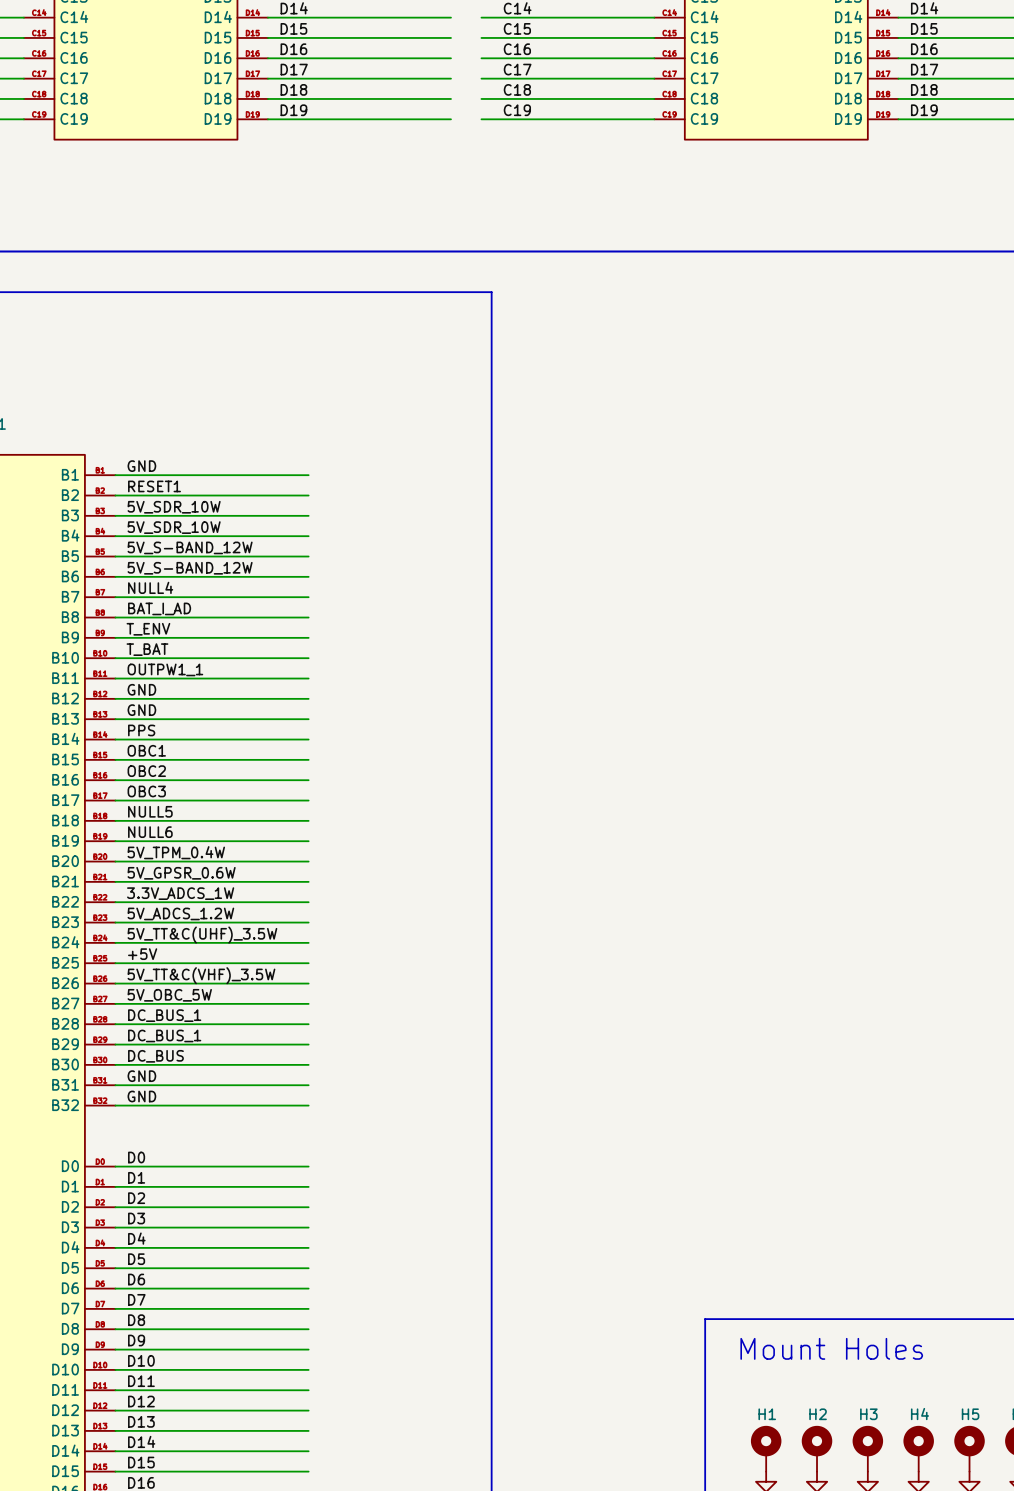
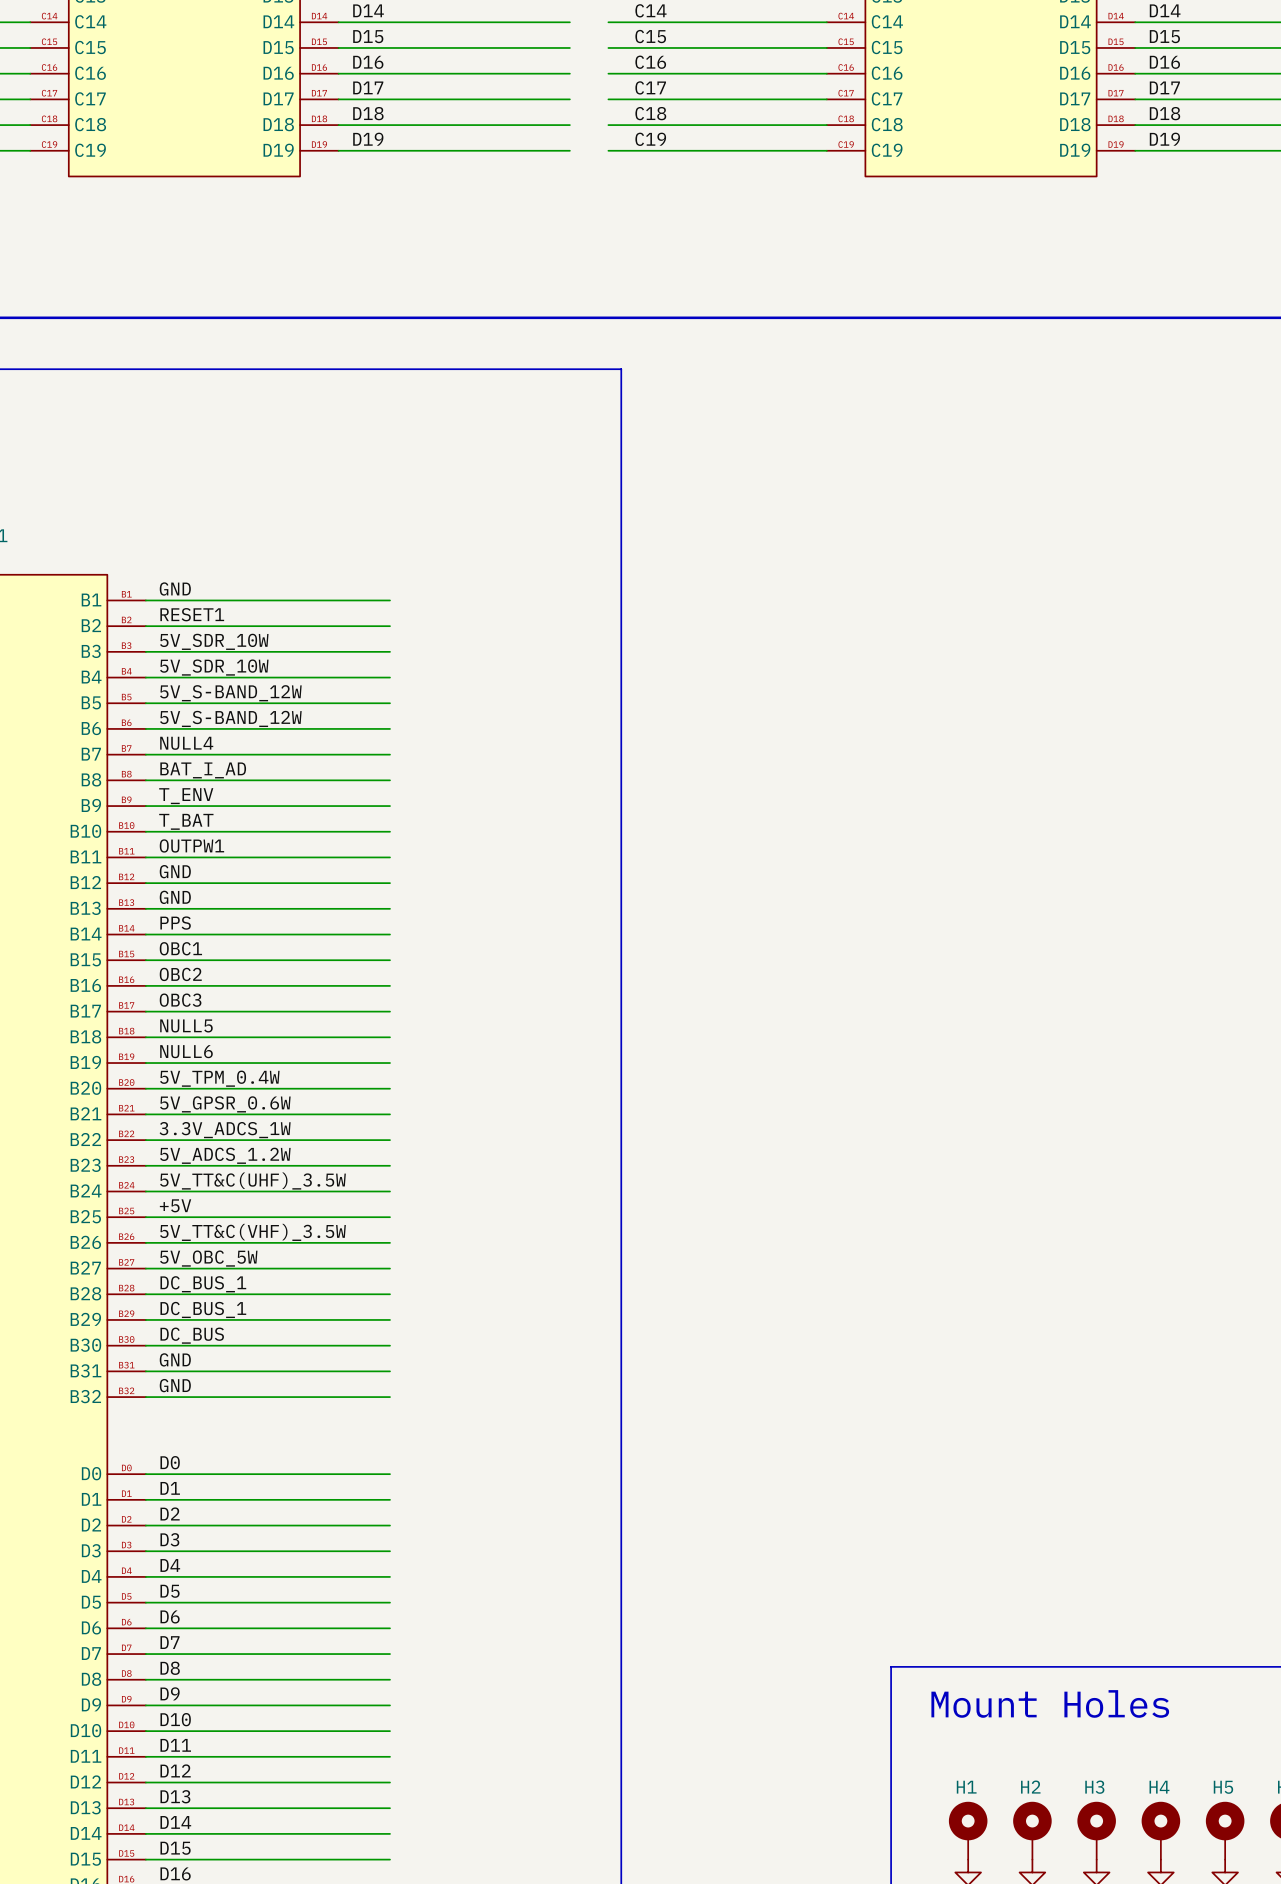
label: OUTPW1_1 (165, 669) -> OUTPW1 (191, 845)

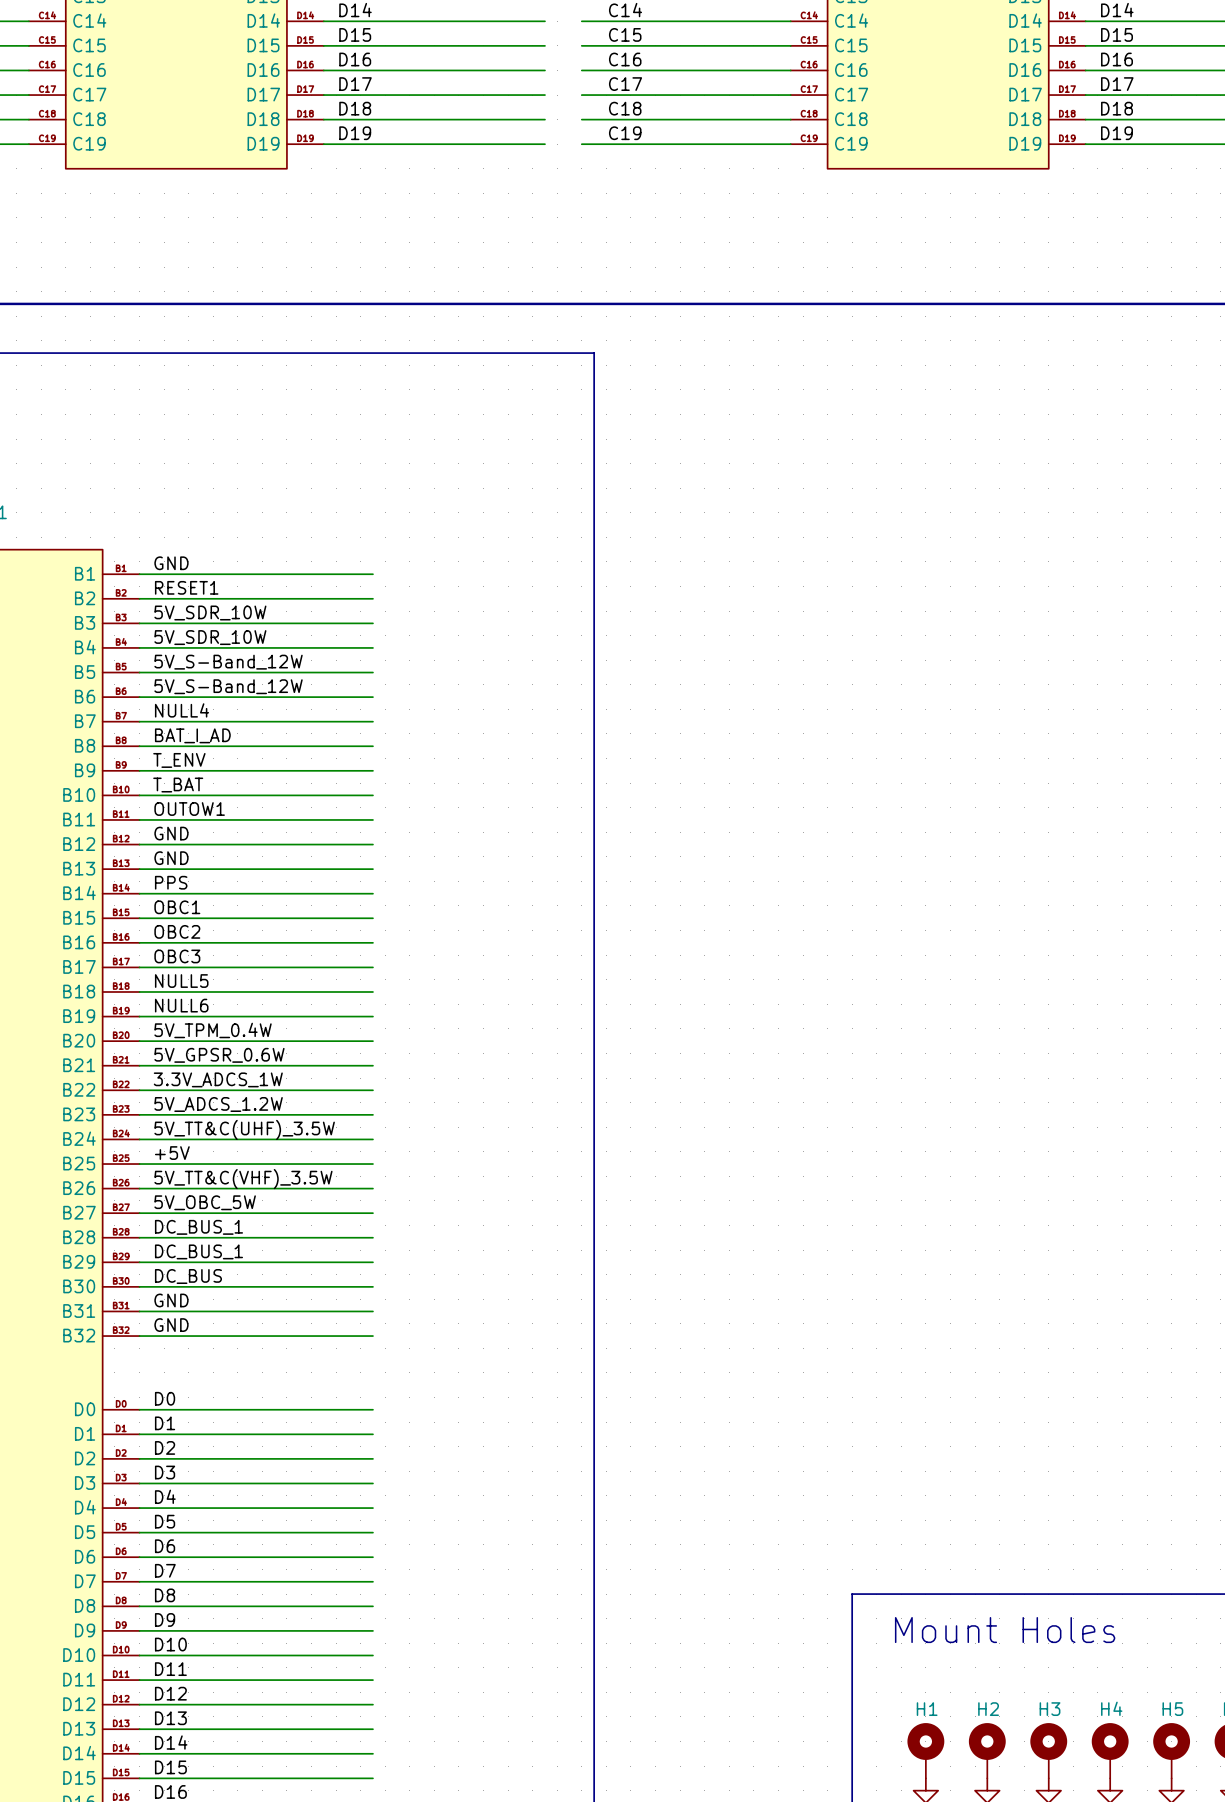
label: 5V_S-BAND_12W (230, 693) -> 5V_S-Band_12W (228, 662)
label: 5V_S-BAND_12W (230, 718) -> 5V_S-Band_12W (228, 686)
label: OUTPW1 (191, 845) -> OUTOW1 (189, 809)

